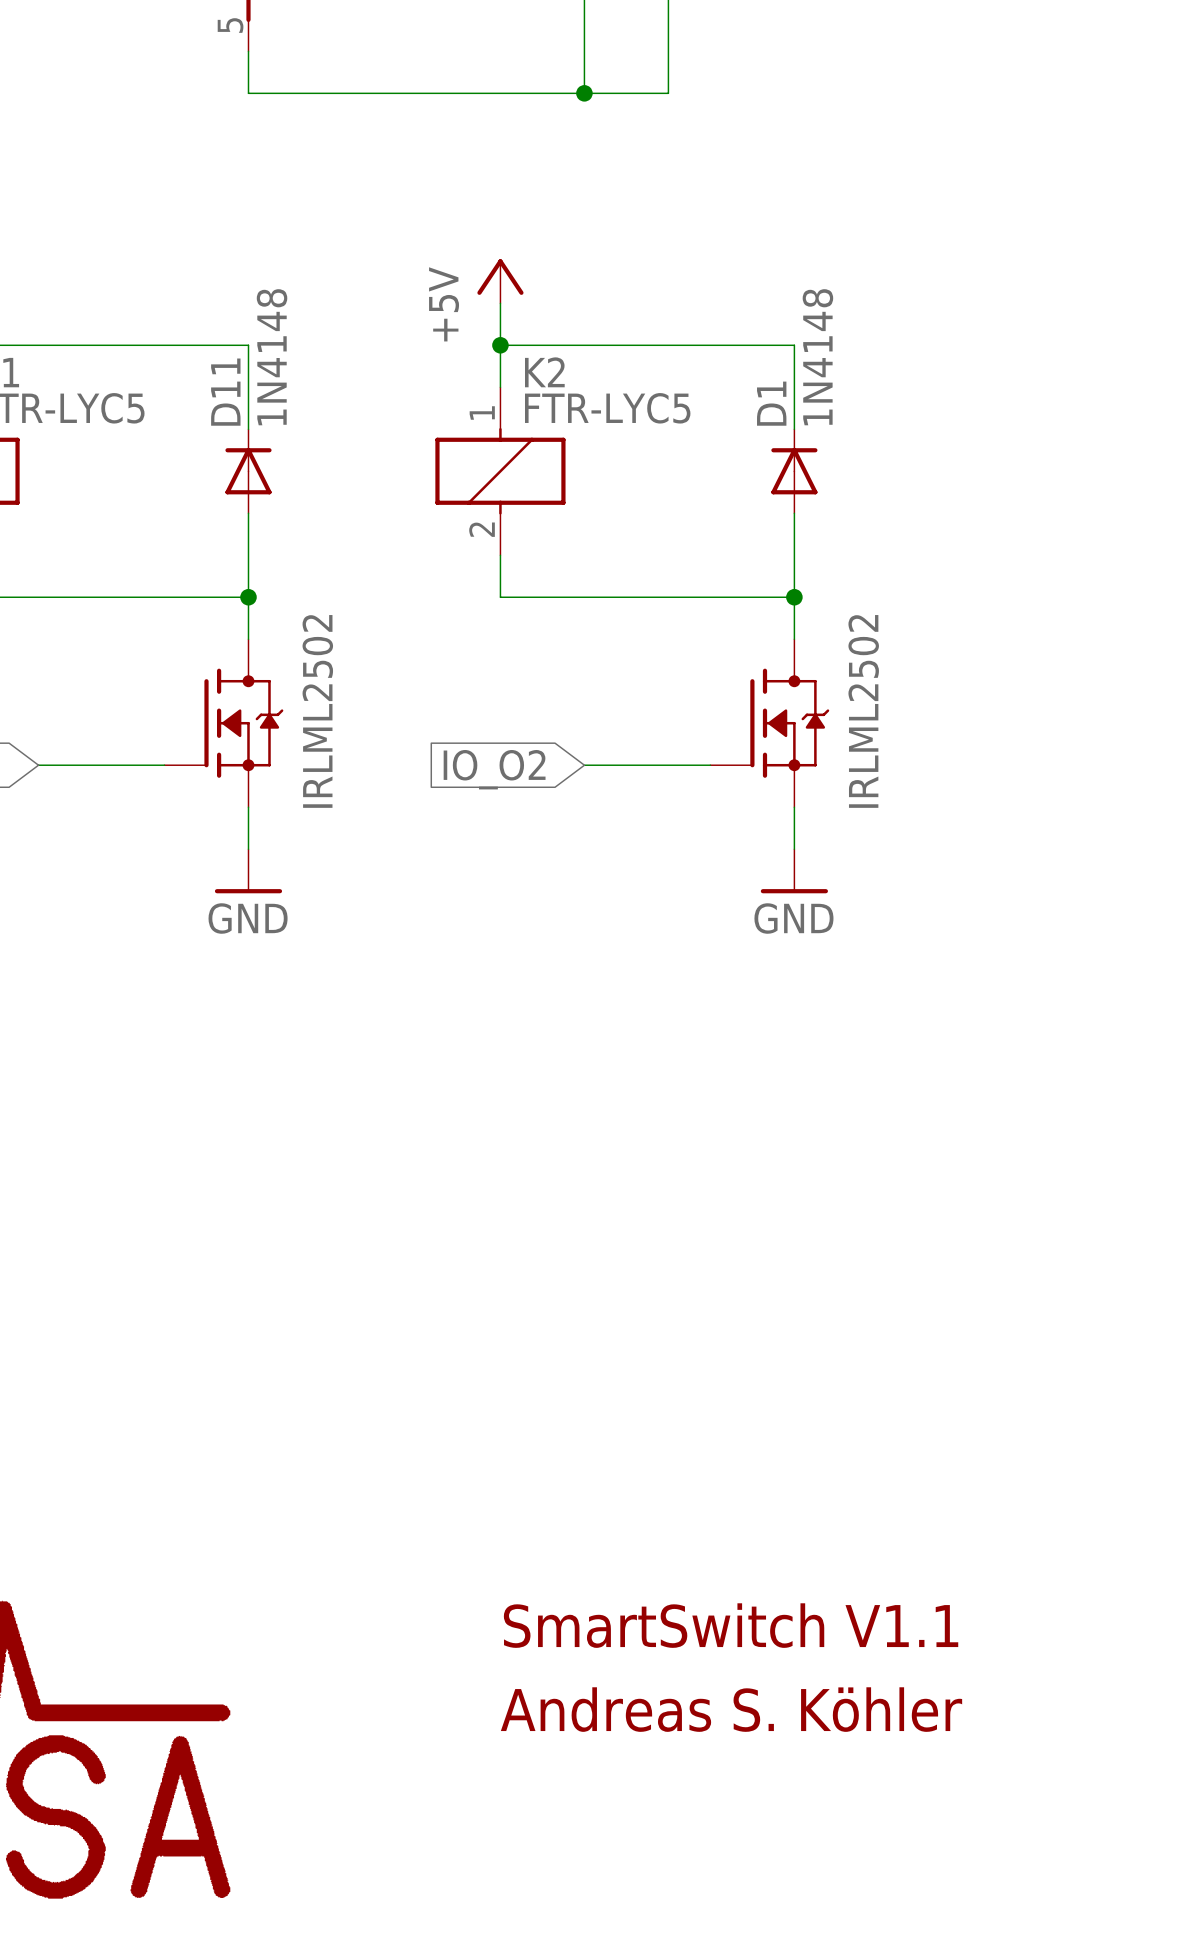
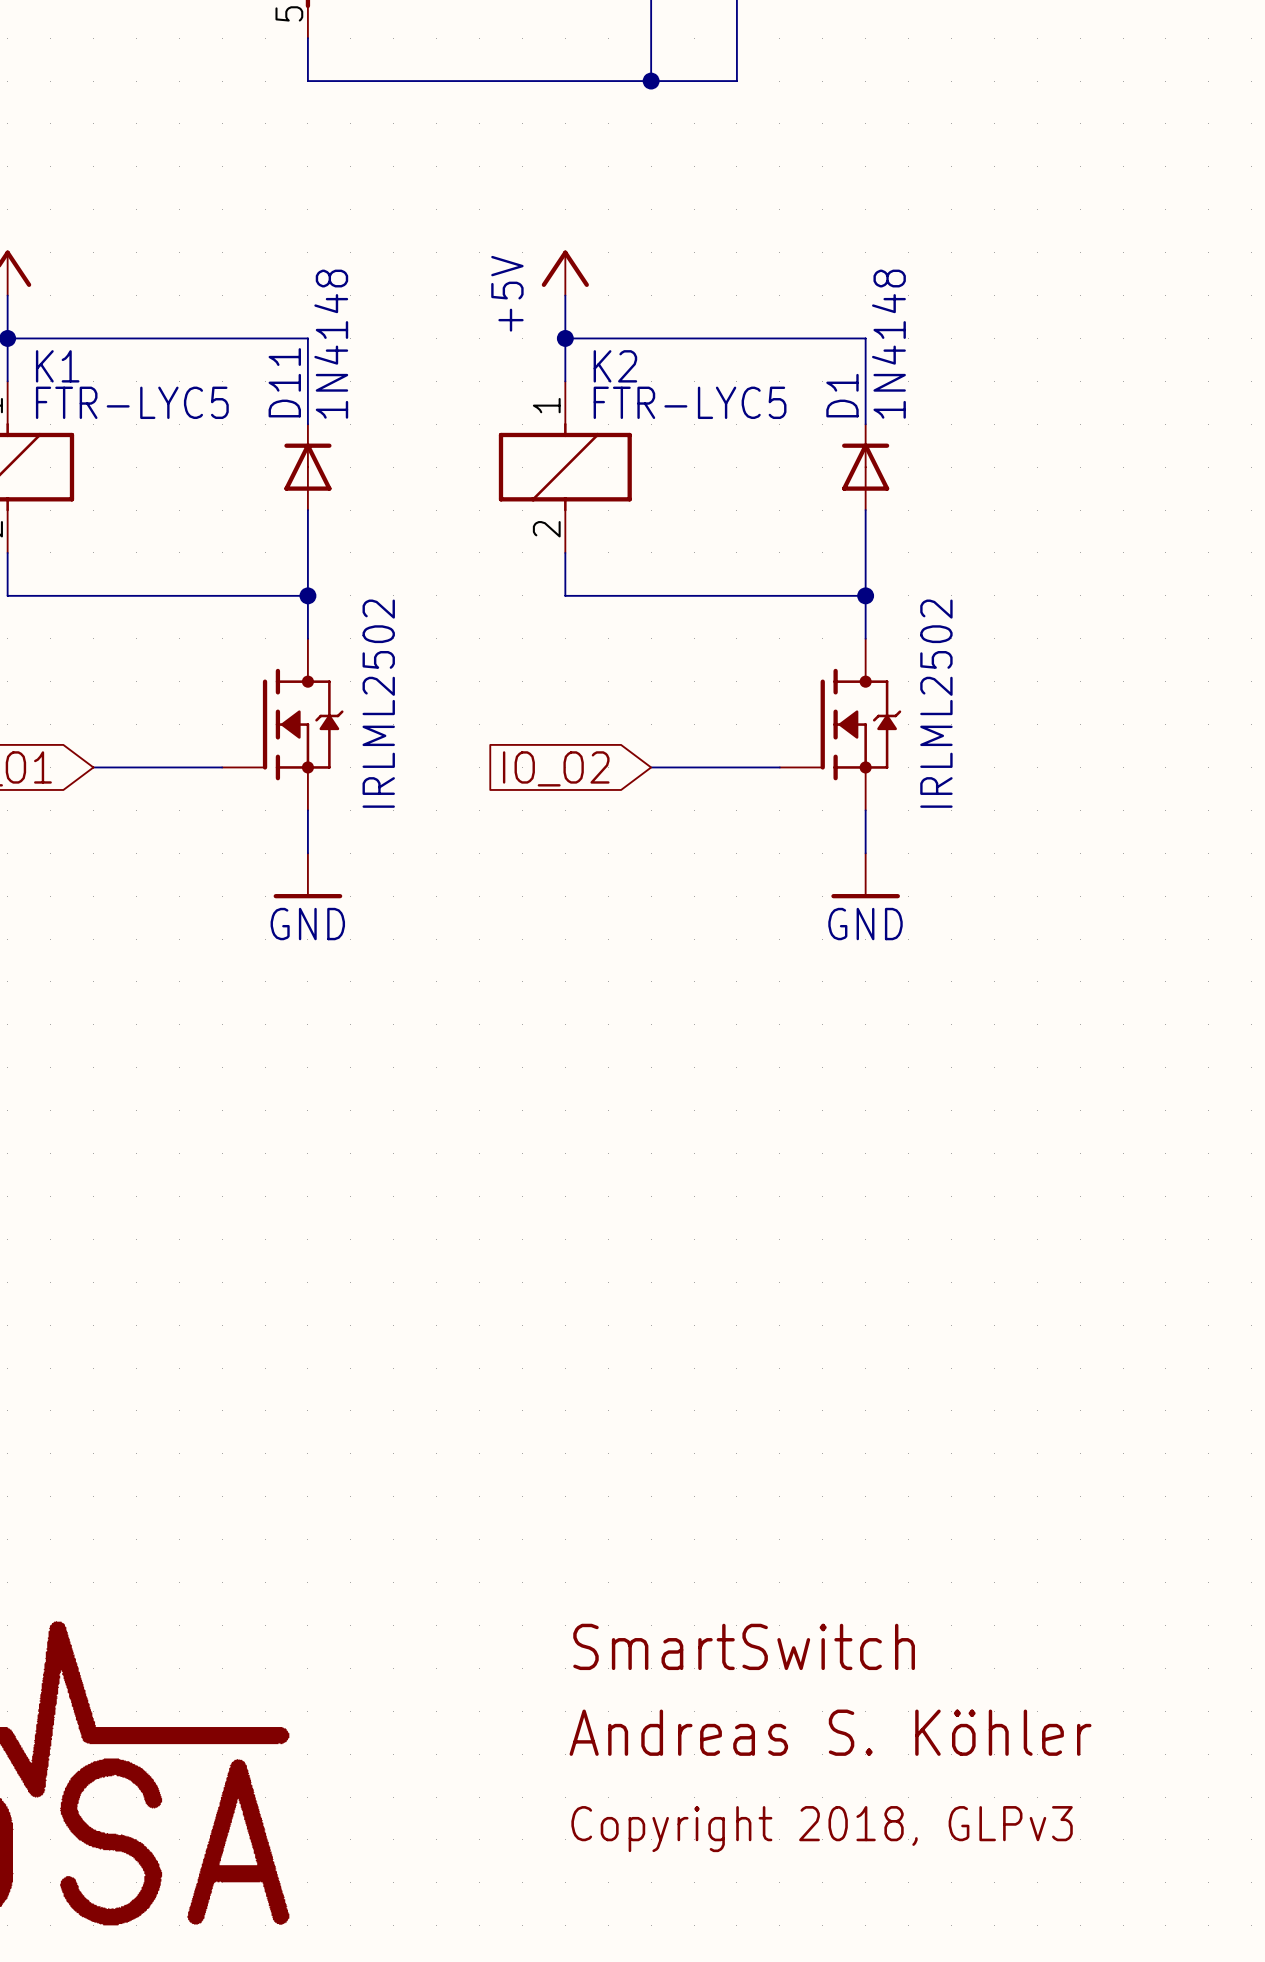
text: SmartSwitch V1.1 (731, 1625) -> SmartSwitch (744, 1646)
text: none -> Copyright 2018, GLPv3 (822, 1829)

